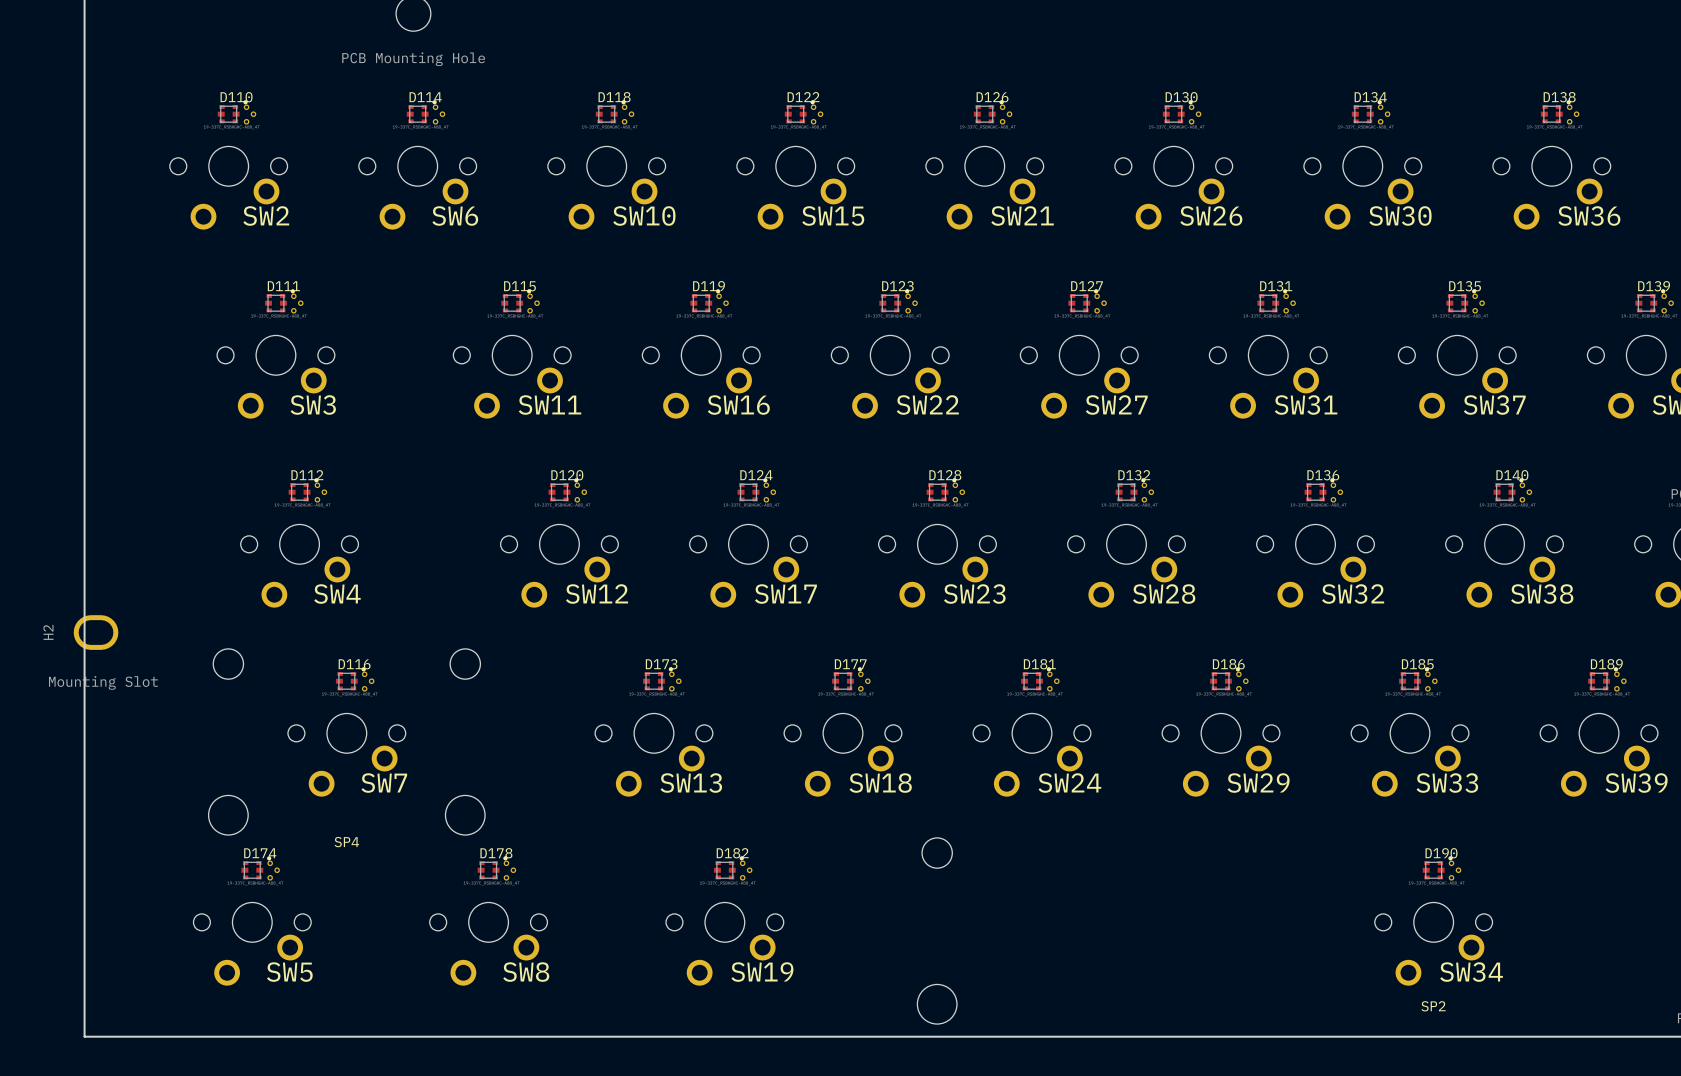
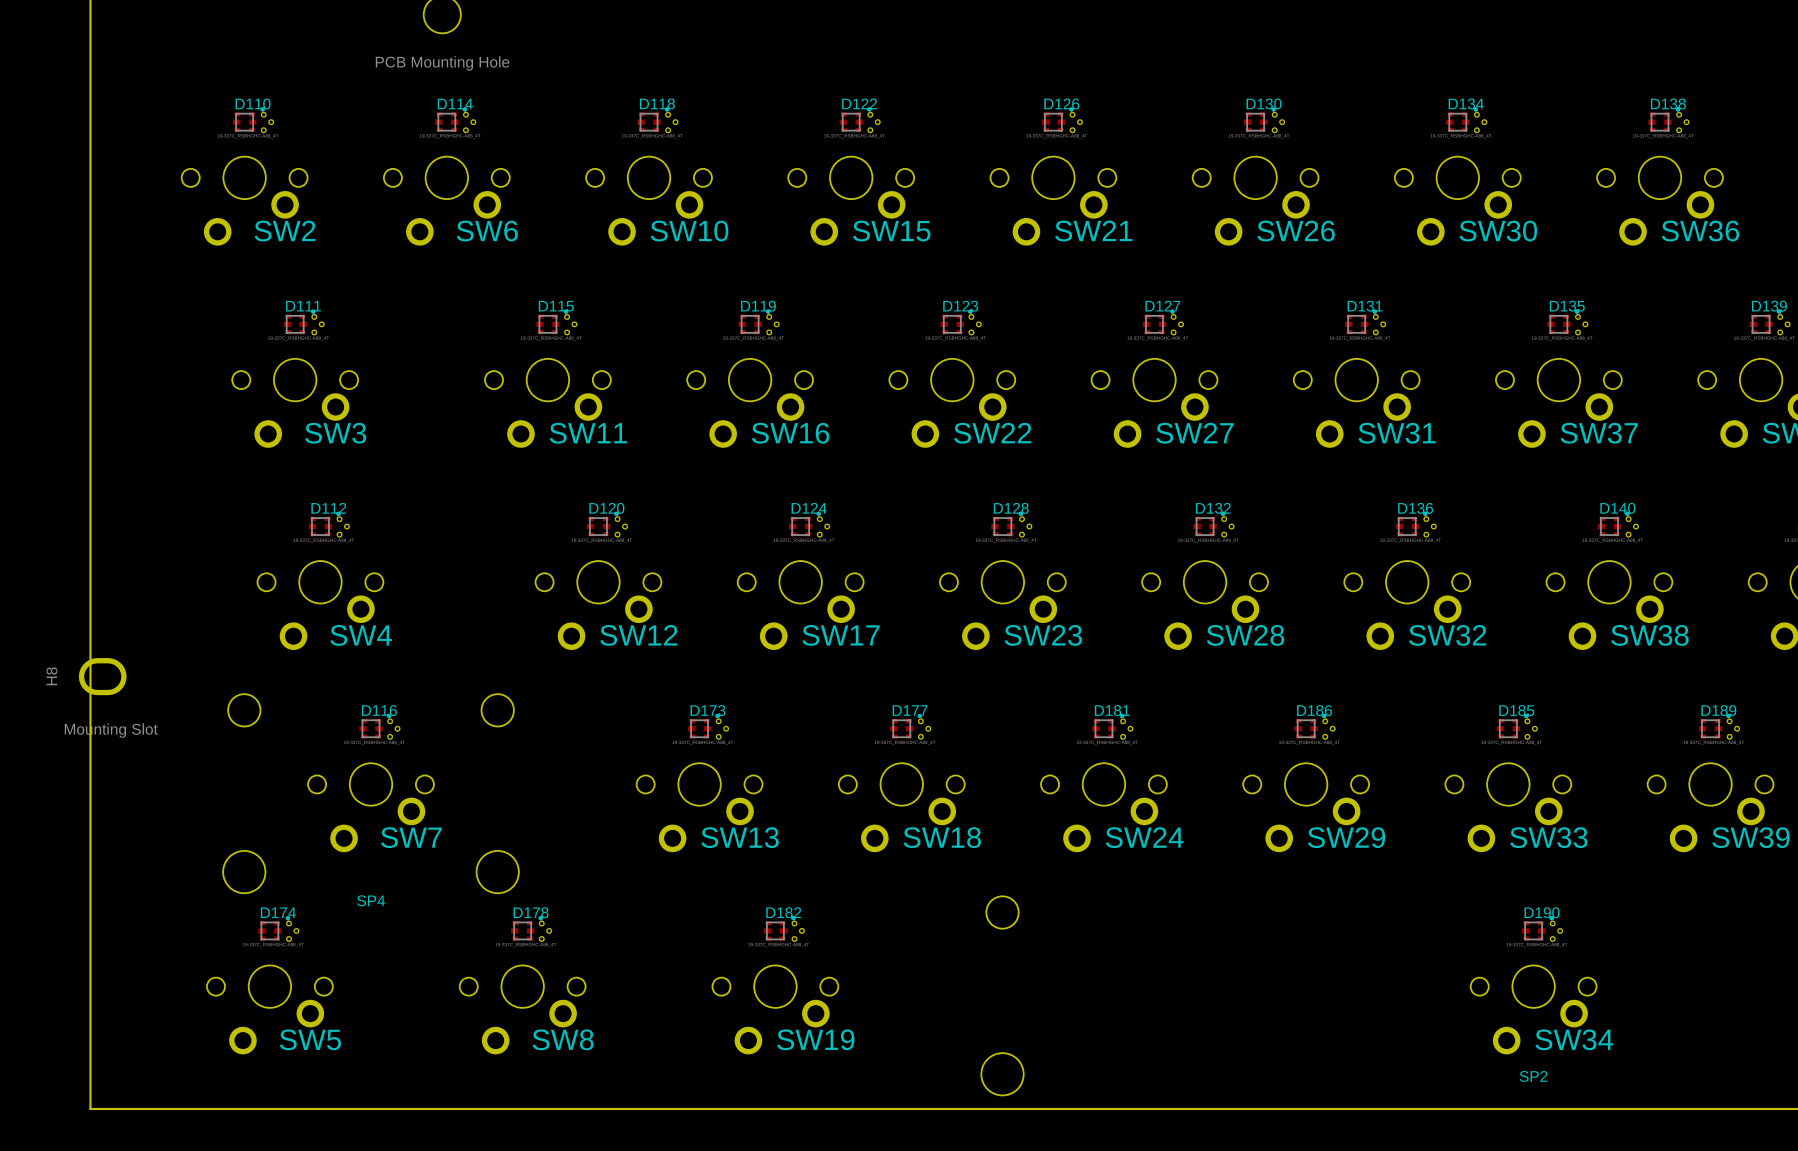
H2 name: H2 (48, 632) -> H8 (51, 676)

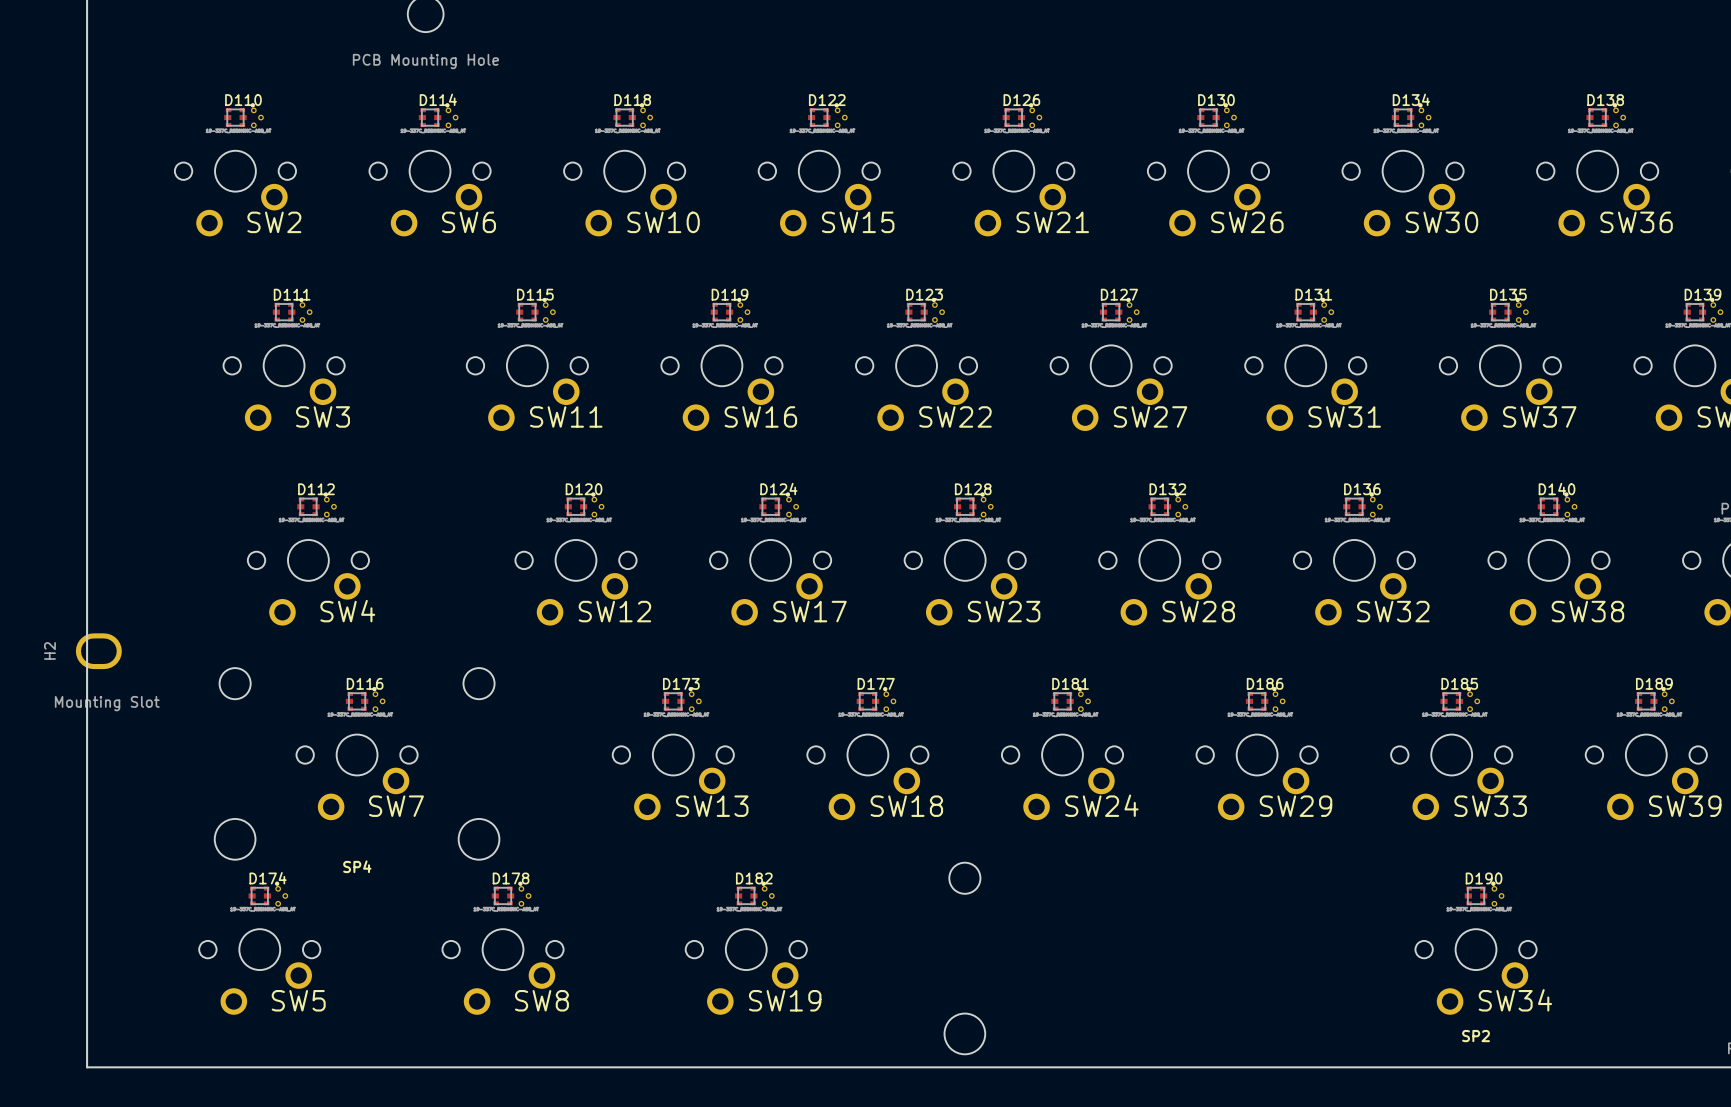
H8 name: H8 (51, 676) -> H2 (49, 650)

